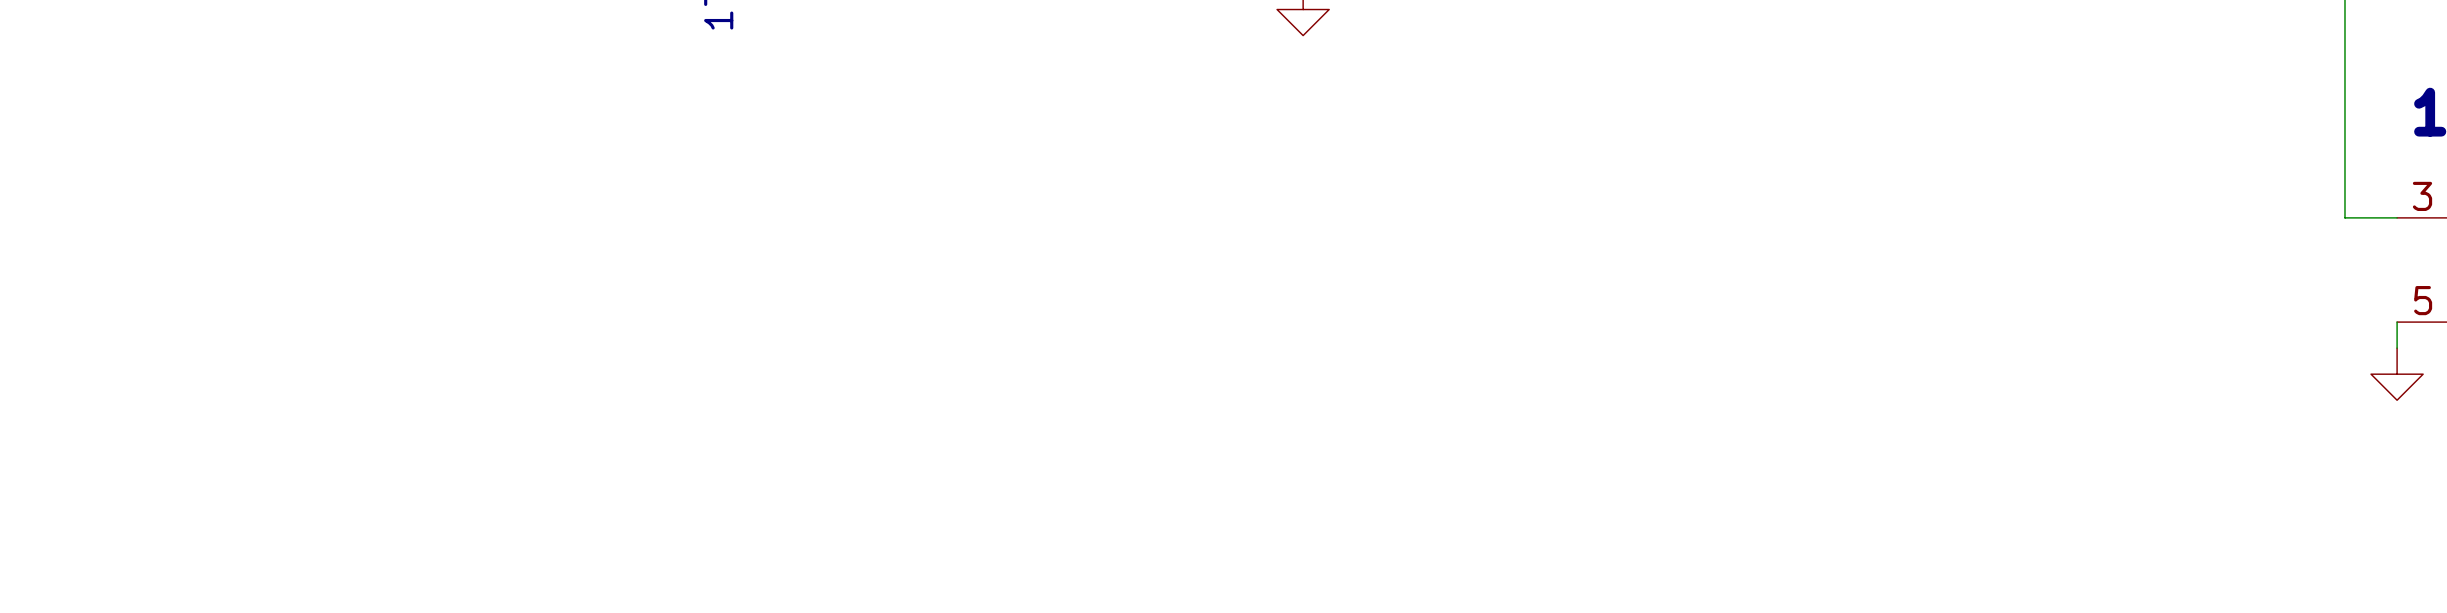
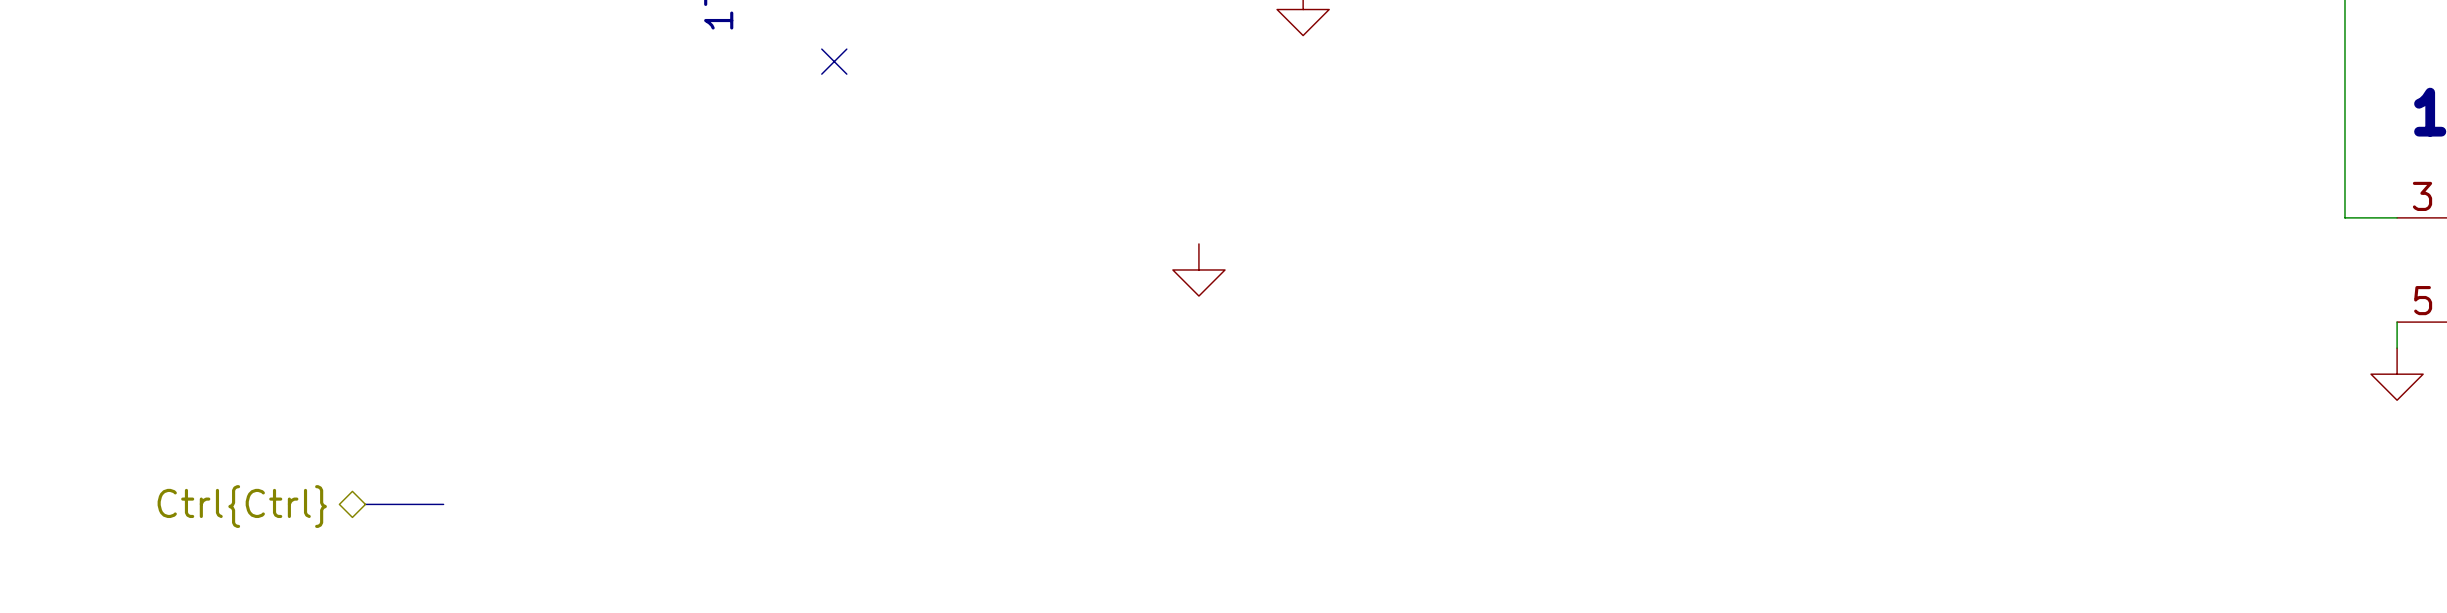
no-connect mark: none -> (834, 61)
power symbol: none -> (1198, 269)
bus: none -> (365, 504) (443, 504)
hierarchical label: none -> Ctrl{Ctrl} (242, 506)

